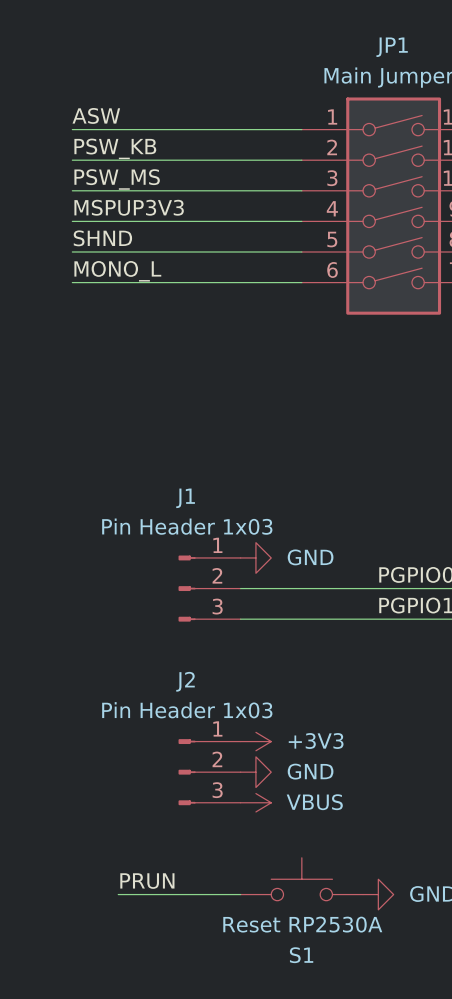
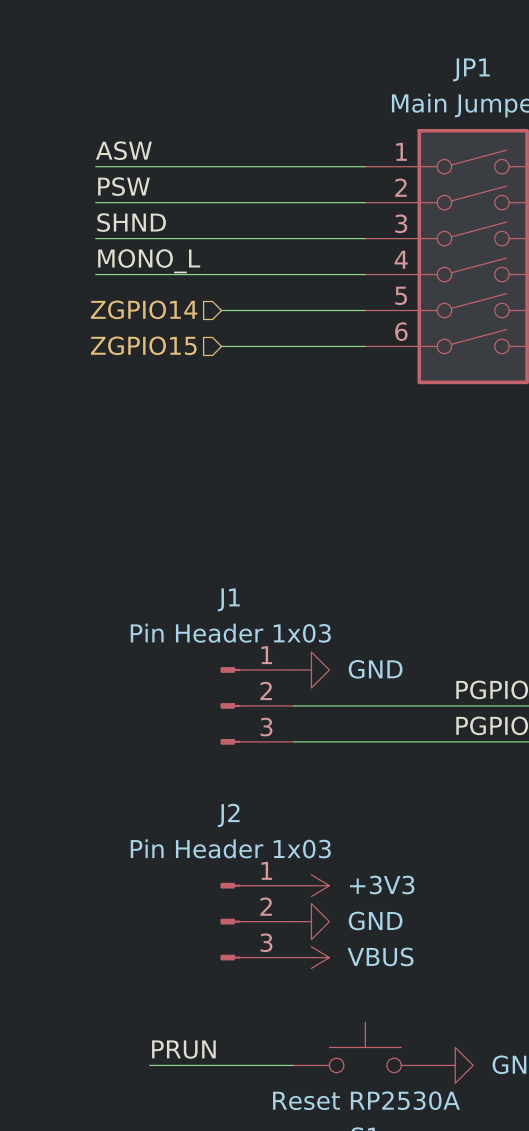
label: PSW_KB (115, 148) -> PSW (124, 186)
label: PSW_MS (117, 179) -> SHND (131, 222)
label: MSPUP3V3 (129, 207) -> MONO_L (149, 261)
label: SHND (102, 238) -> none
wire: (72, 251) (179, 251) -> none
hierarchical label: none -> ZGPIO14 (144, 309)
label: MONO_L (117, 271) -> none
wire: (72, 282) (179, 282) -> none
hierarchical label: none -> ZGPIO15 (143, 345)

